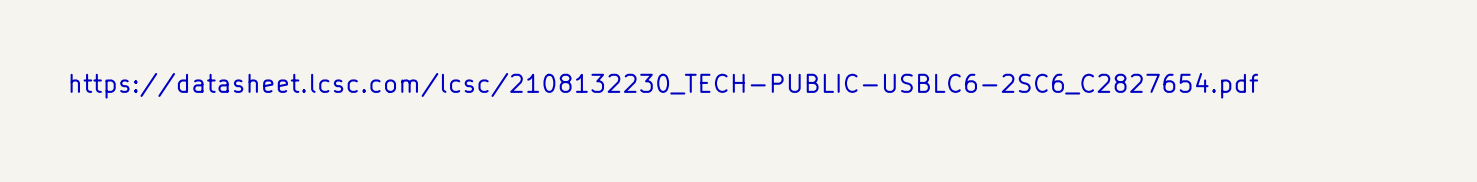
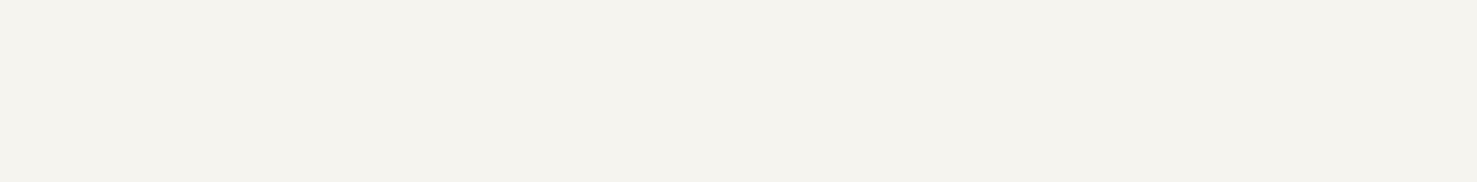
text: https://datasheet.lcsc.com/lcsc/2108132230_TECH-PUBLIC-USBLC6-2SC6_C2827654.pdf (664, 85) -> none

